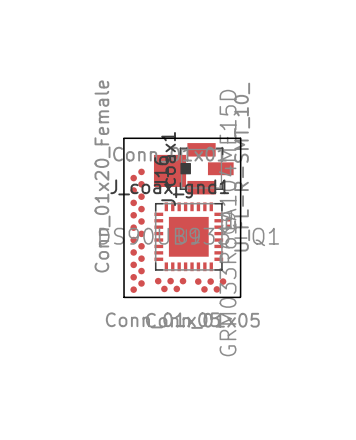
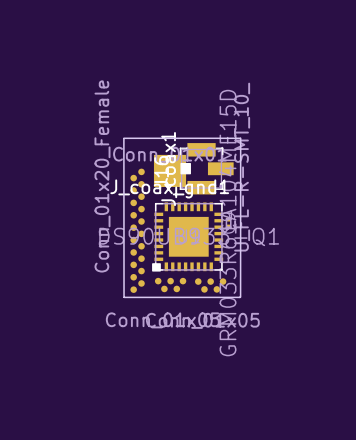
drawing: none -> [152, 263, 161, 272]

